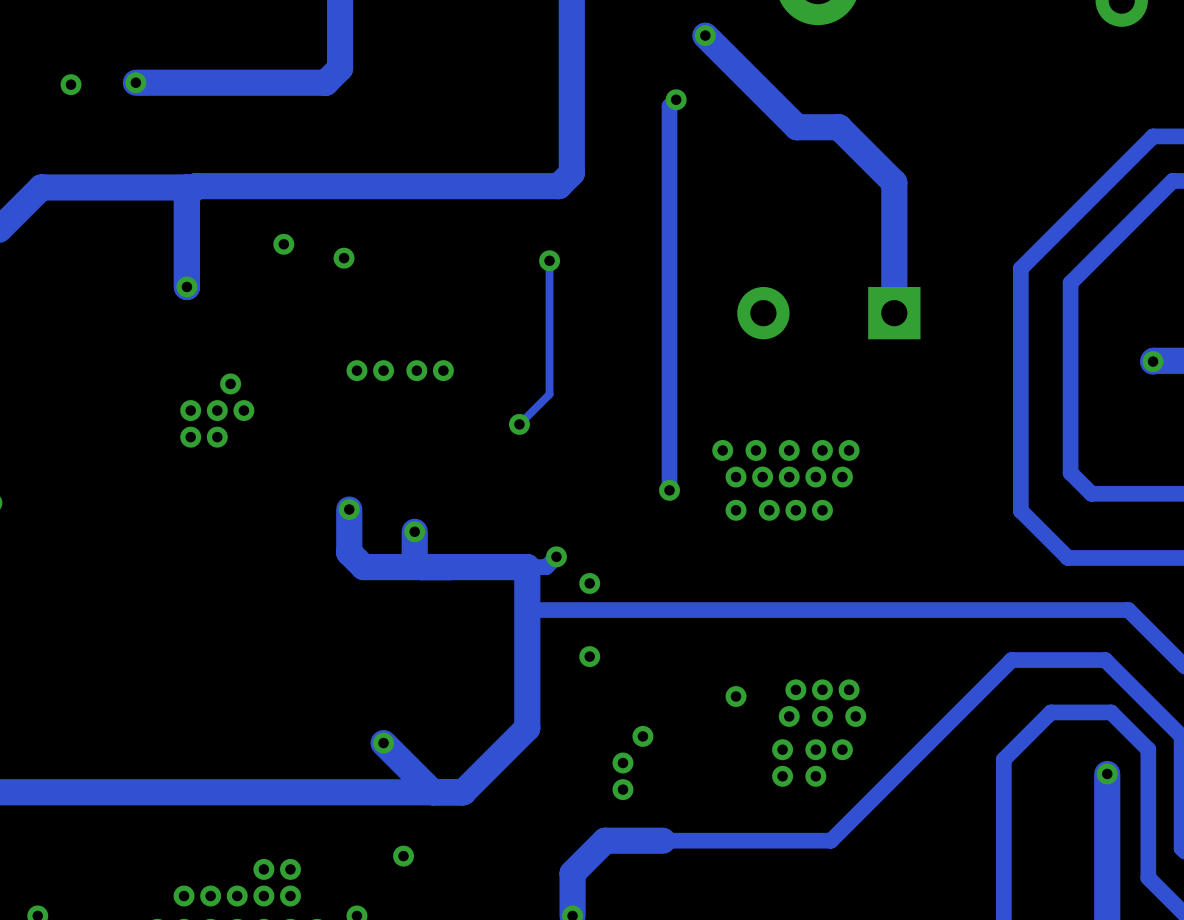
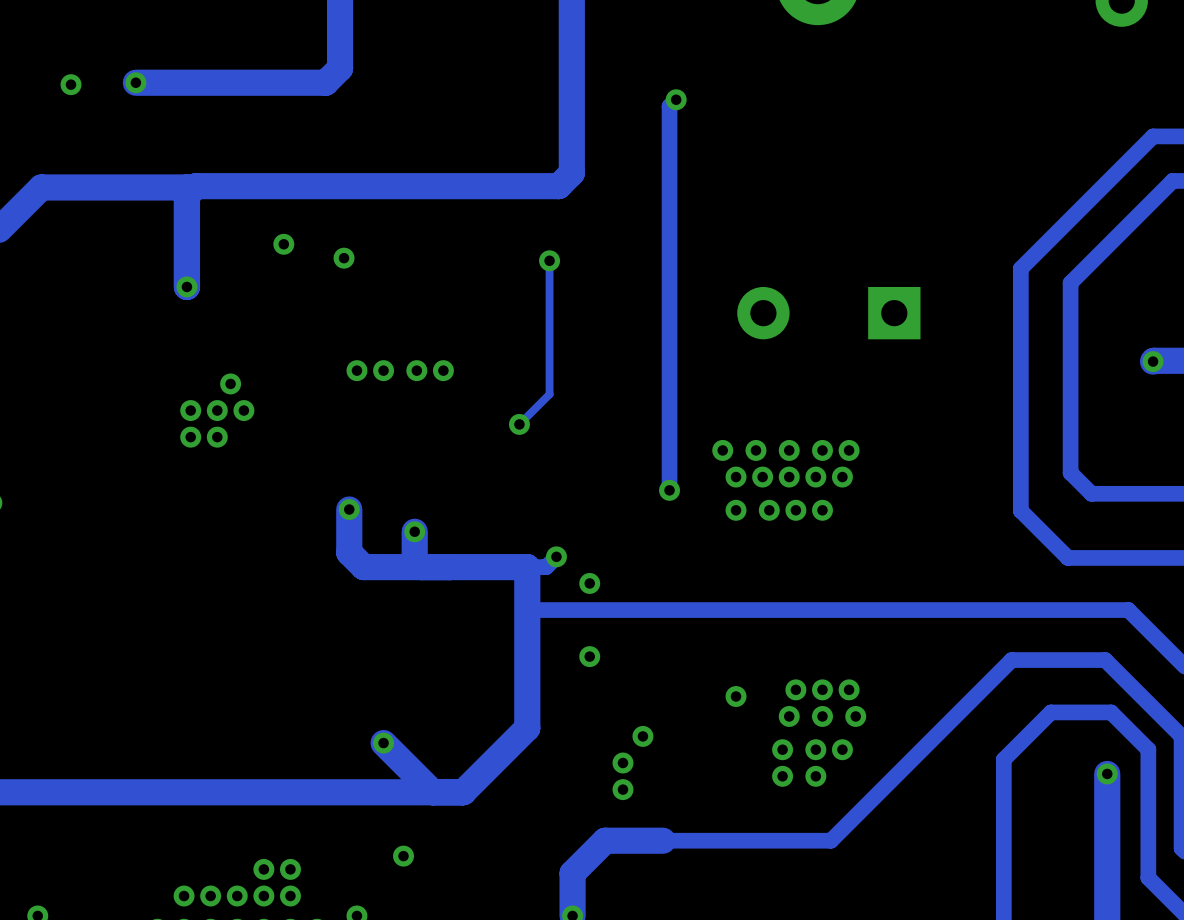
track: (705, 35) (796, 127) (838, 127) (894, 182) (894, 313) -> none
via: (705, 35) -> none

